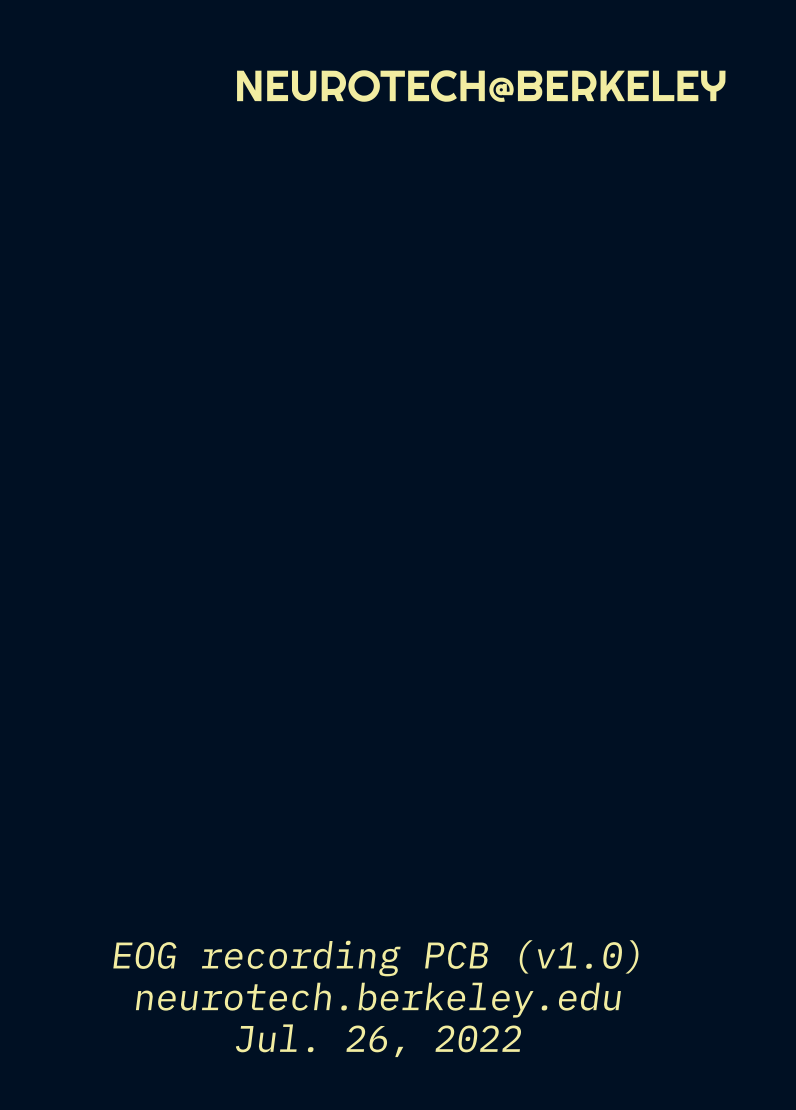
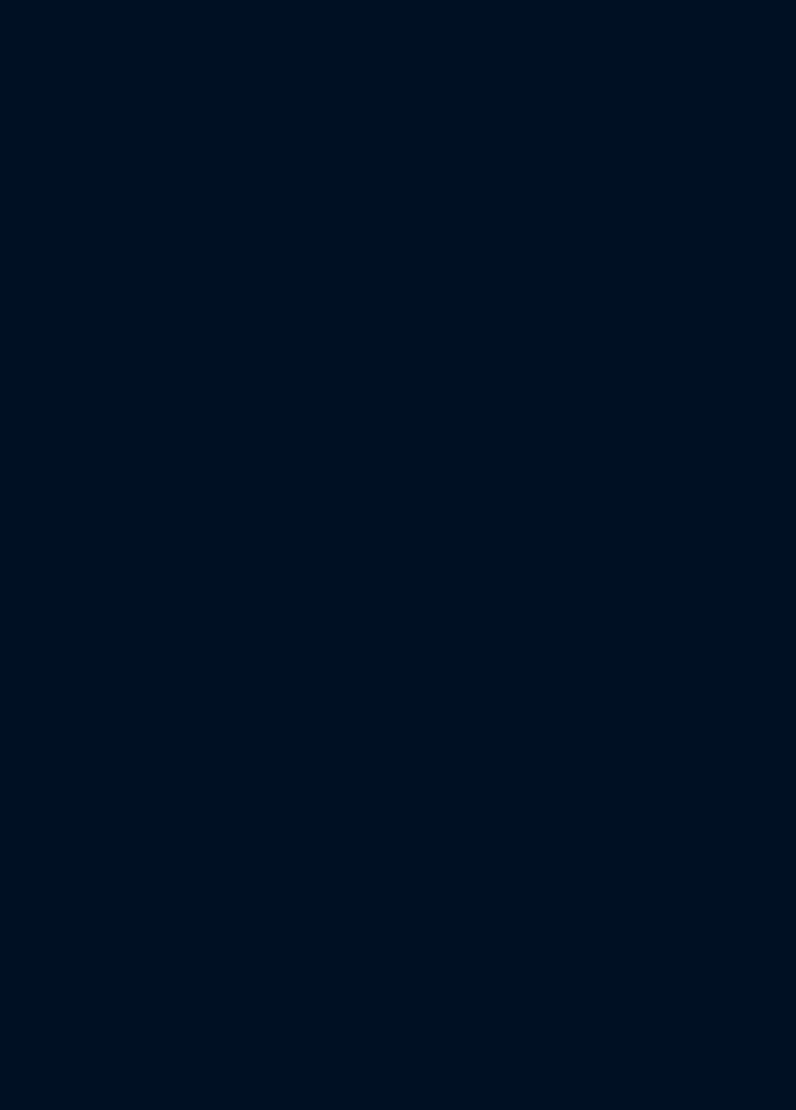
drawing: [237, 70, 726, 102] -> none
text: EOG recording PCB (v1.0) (375, 958) -> none
text: neurotech.berkeley.edu (378, 1000) -> none
text: Jul. 26, 2022 (378, 1040) -> none

